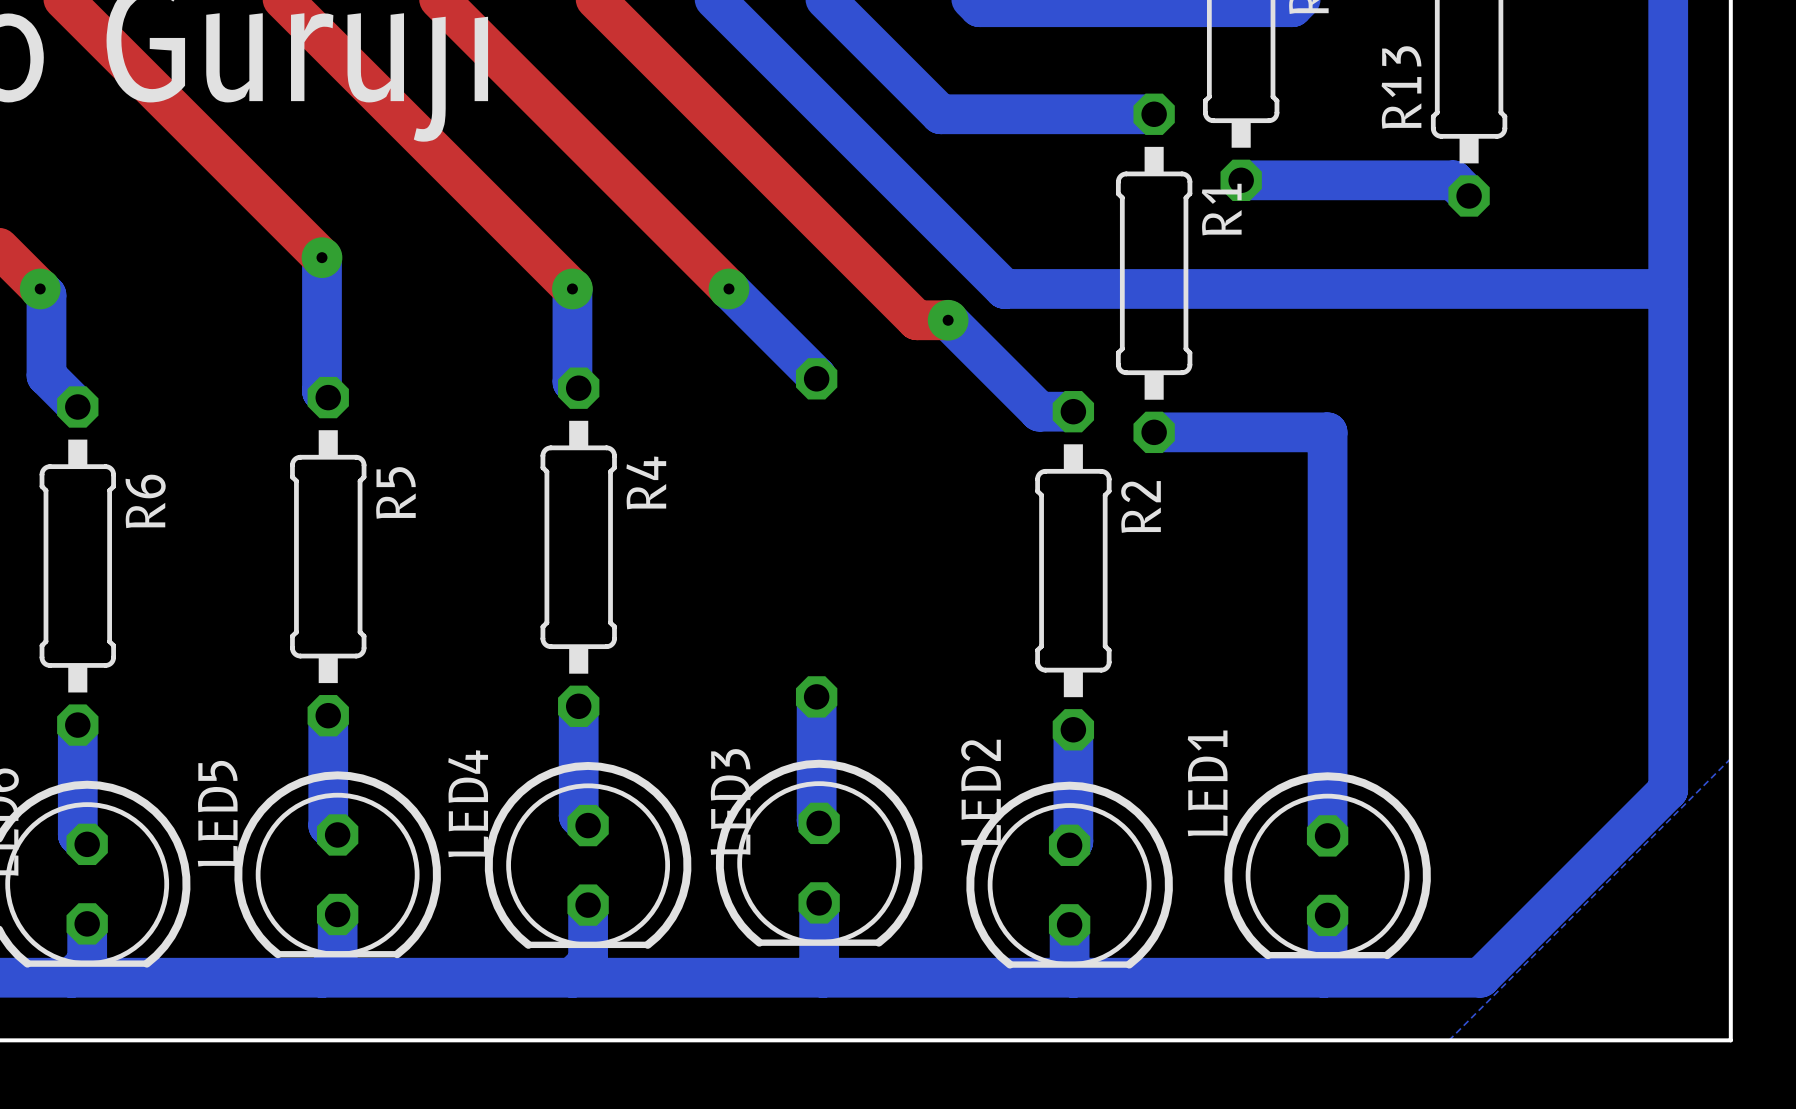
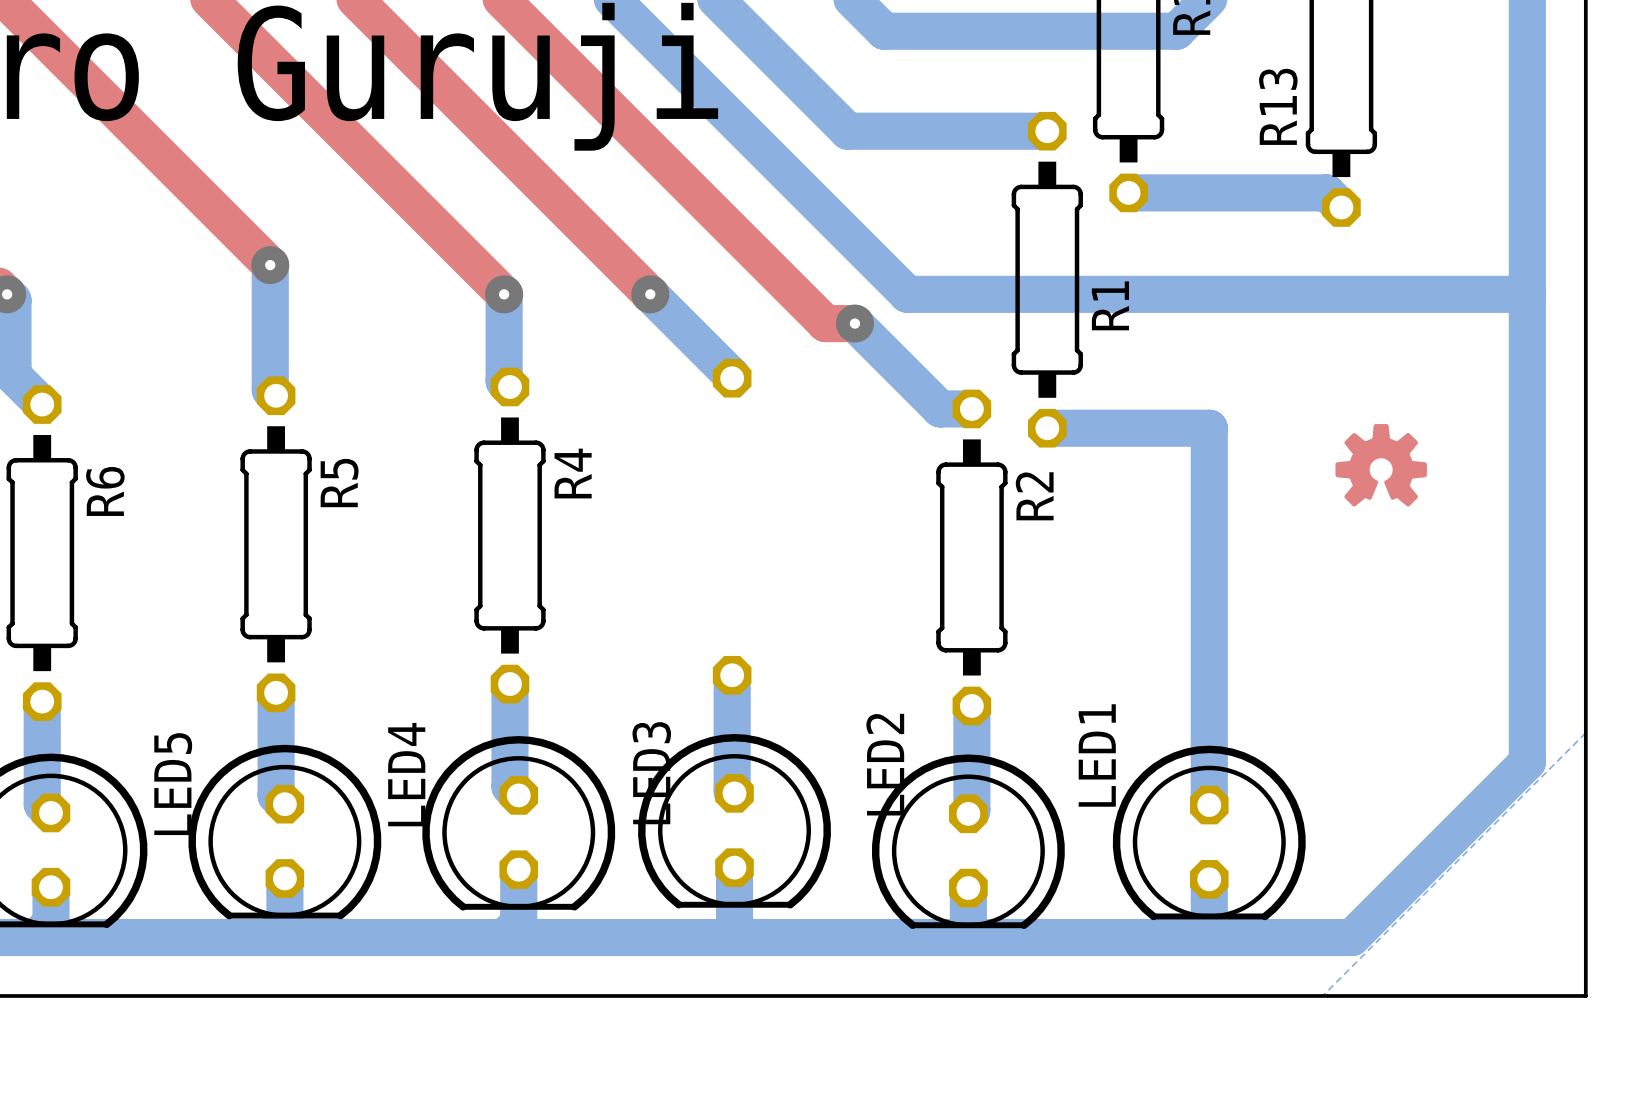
R1 name position: R1 (1221, 209) -> R1 (1110, 305)
drawing: none -> [1335, 424, 1427, 507]

